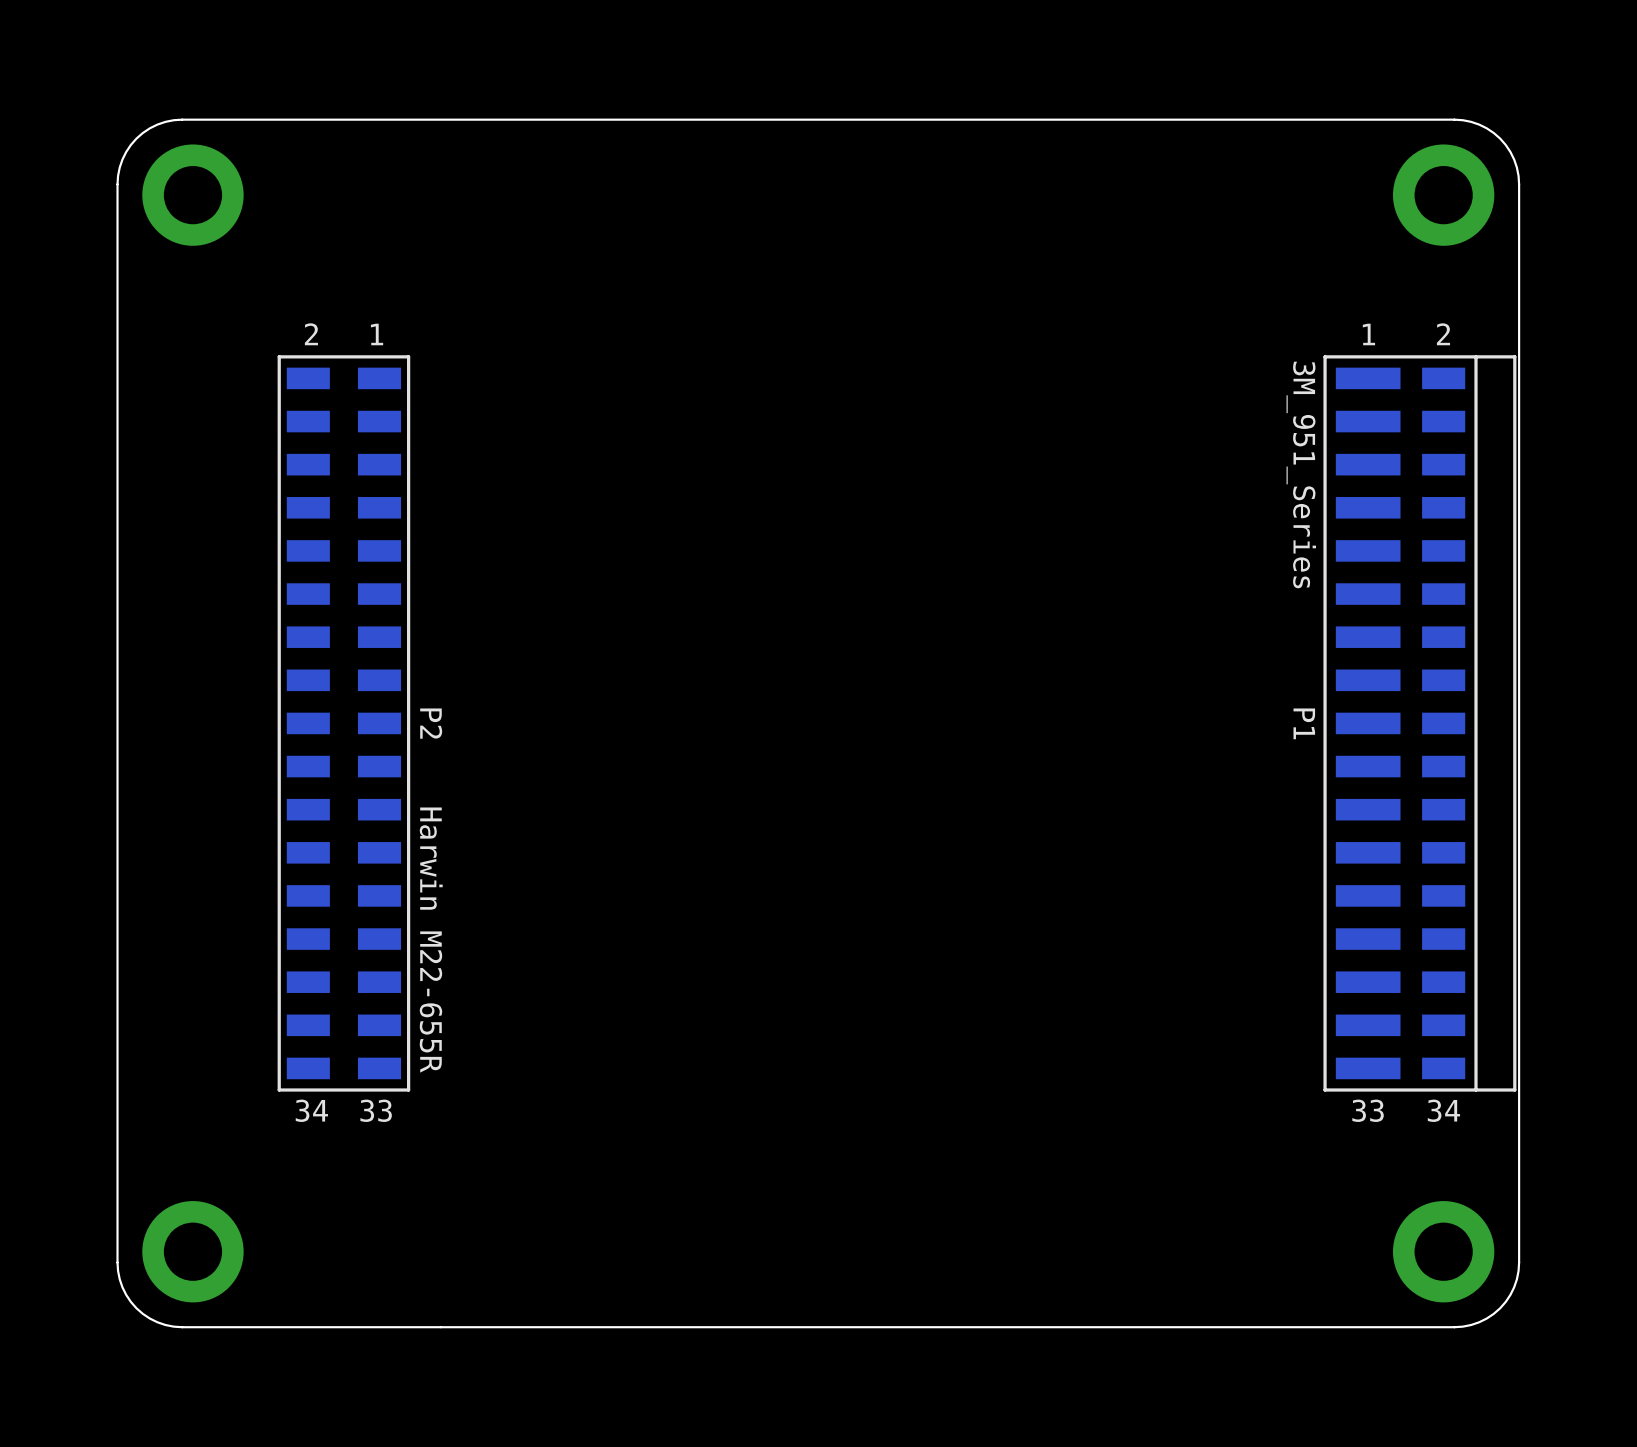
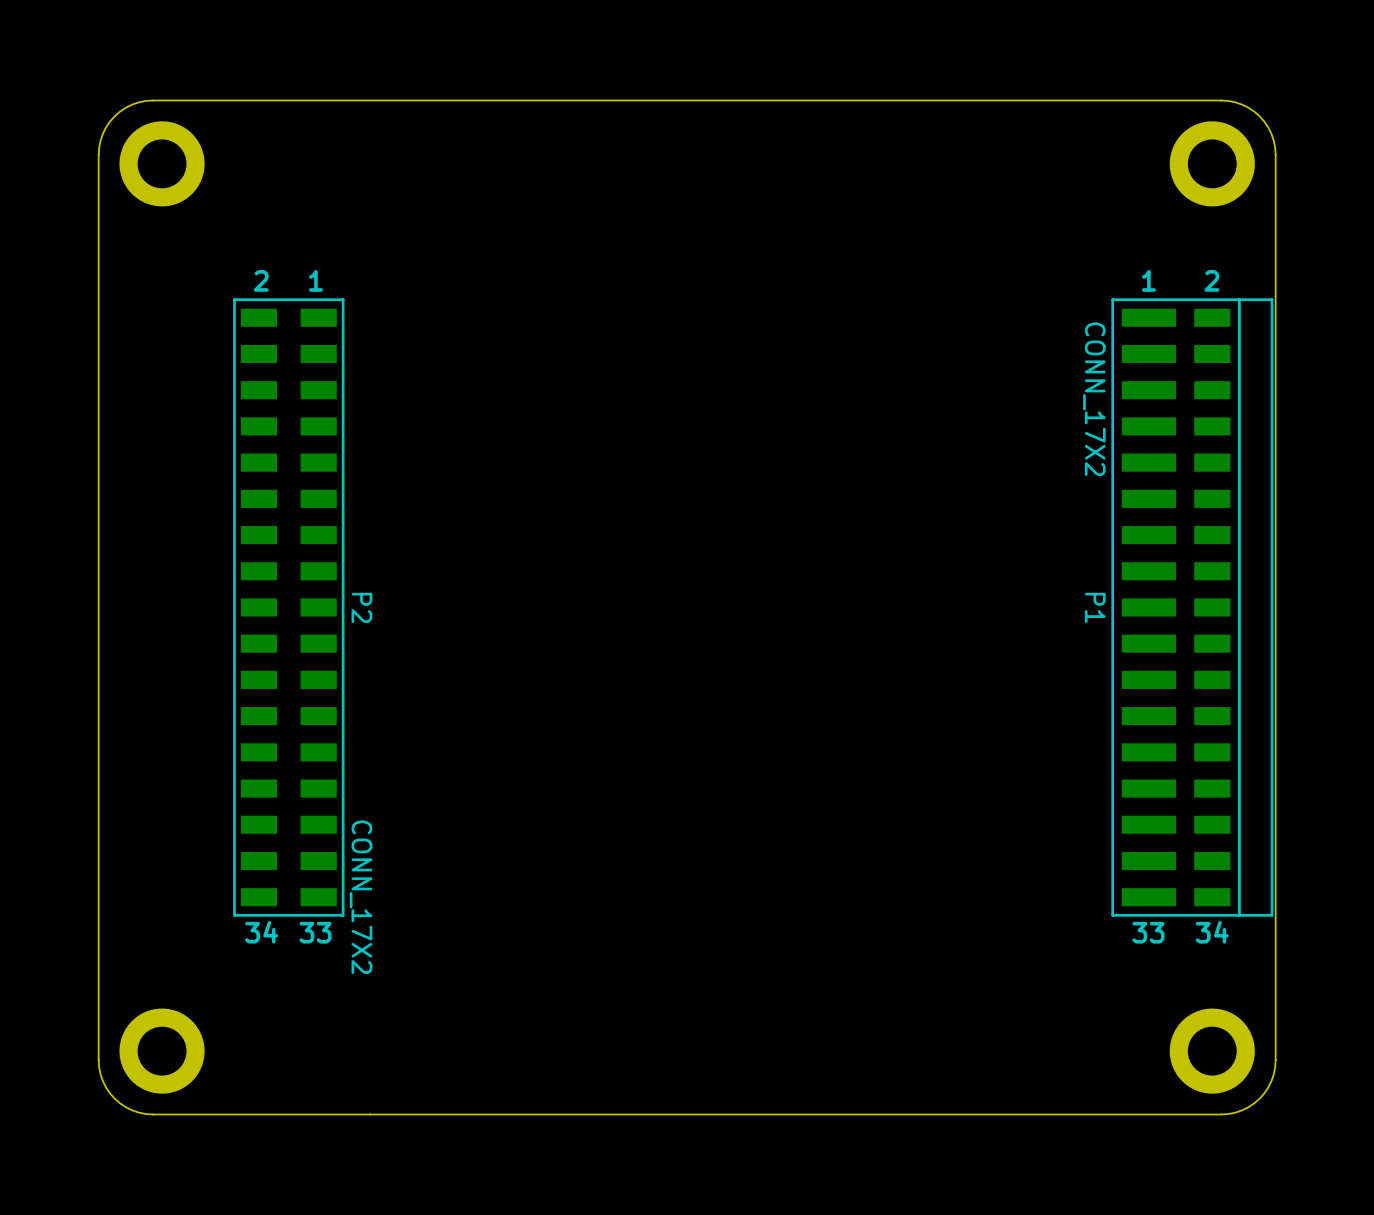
P1 value: 3M_951_Series (1301, 474) -> CONN_17X2 (1094, 399)
P2 value: Harwin M22-655R (431, 940) -> CONN_17X2 (361, 897)

